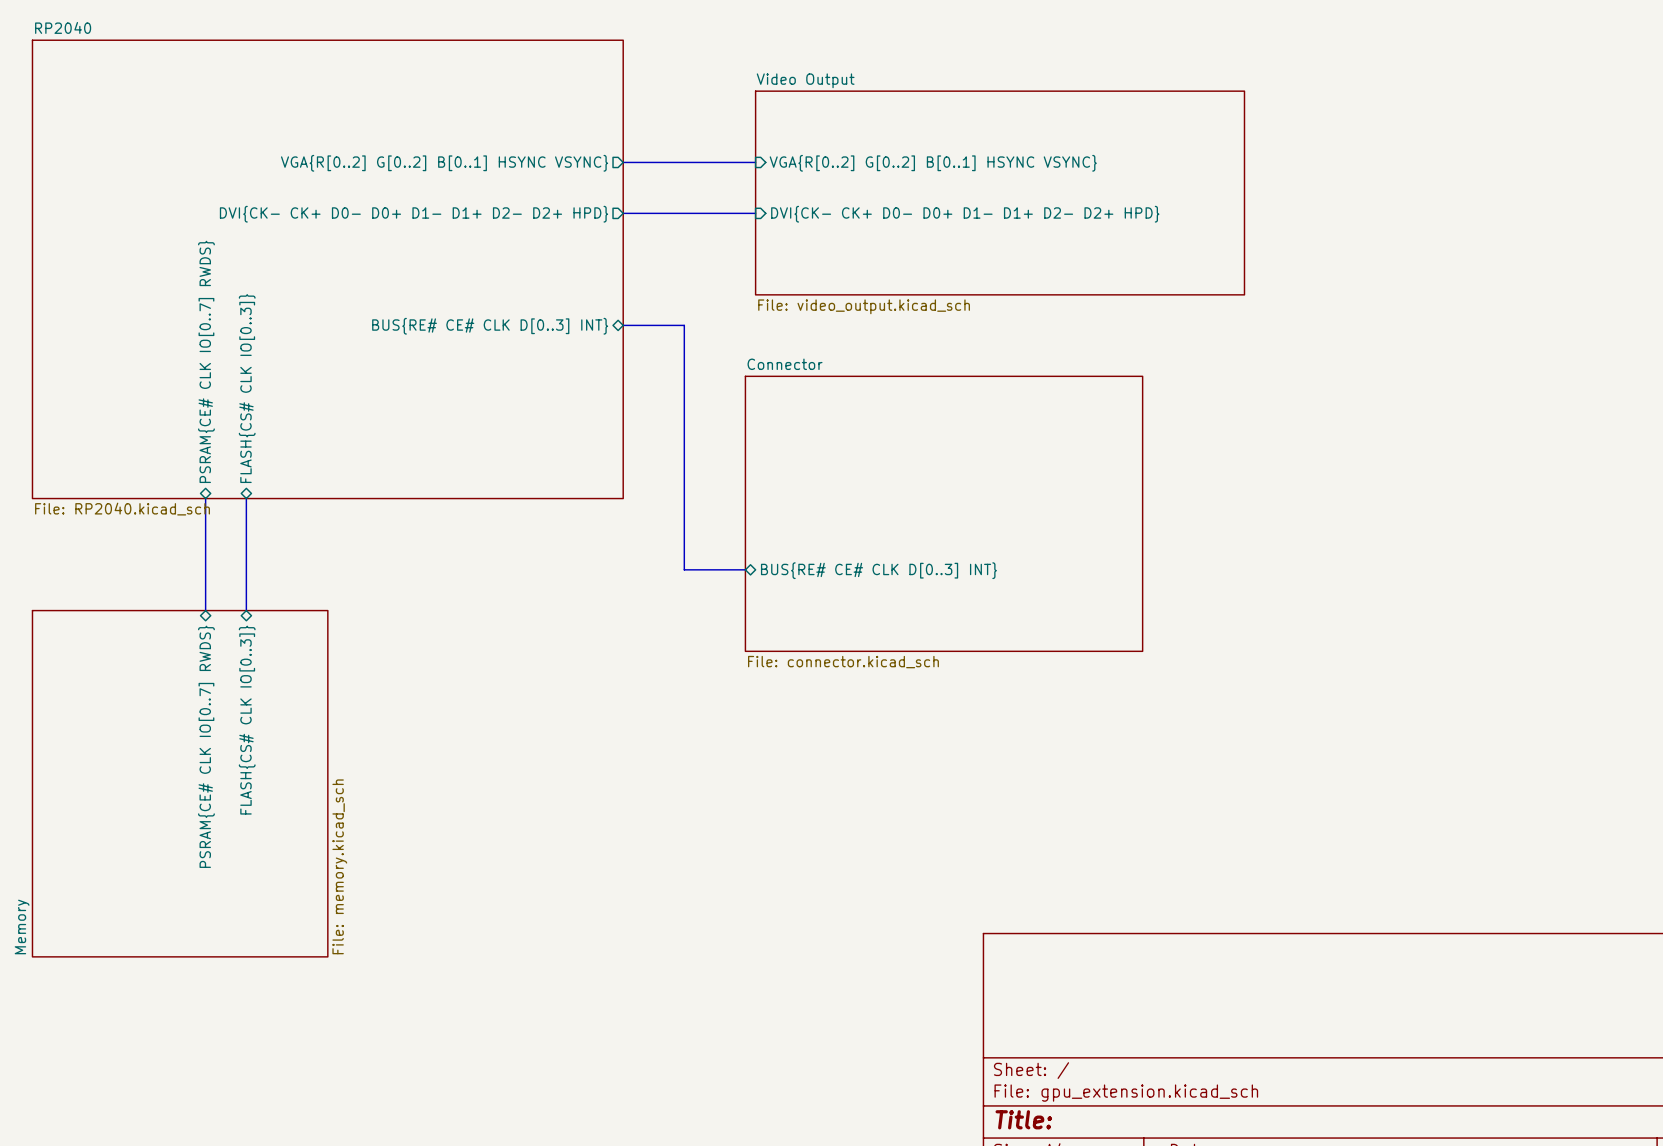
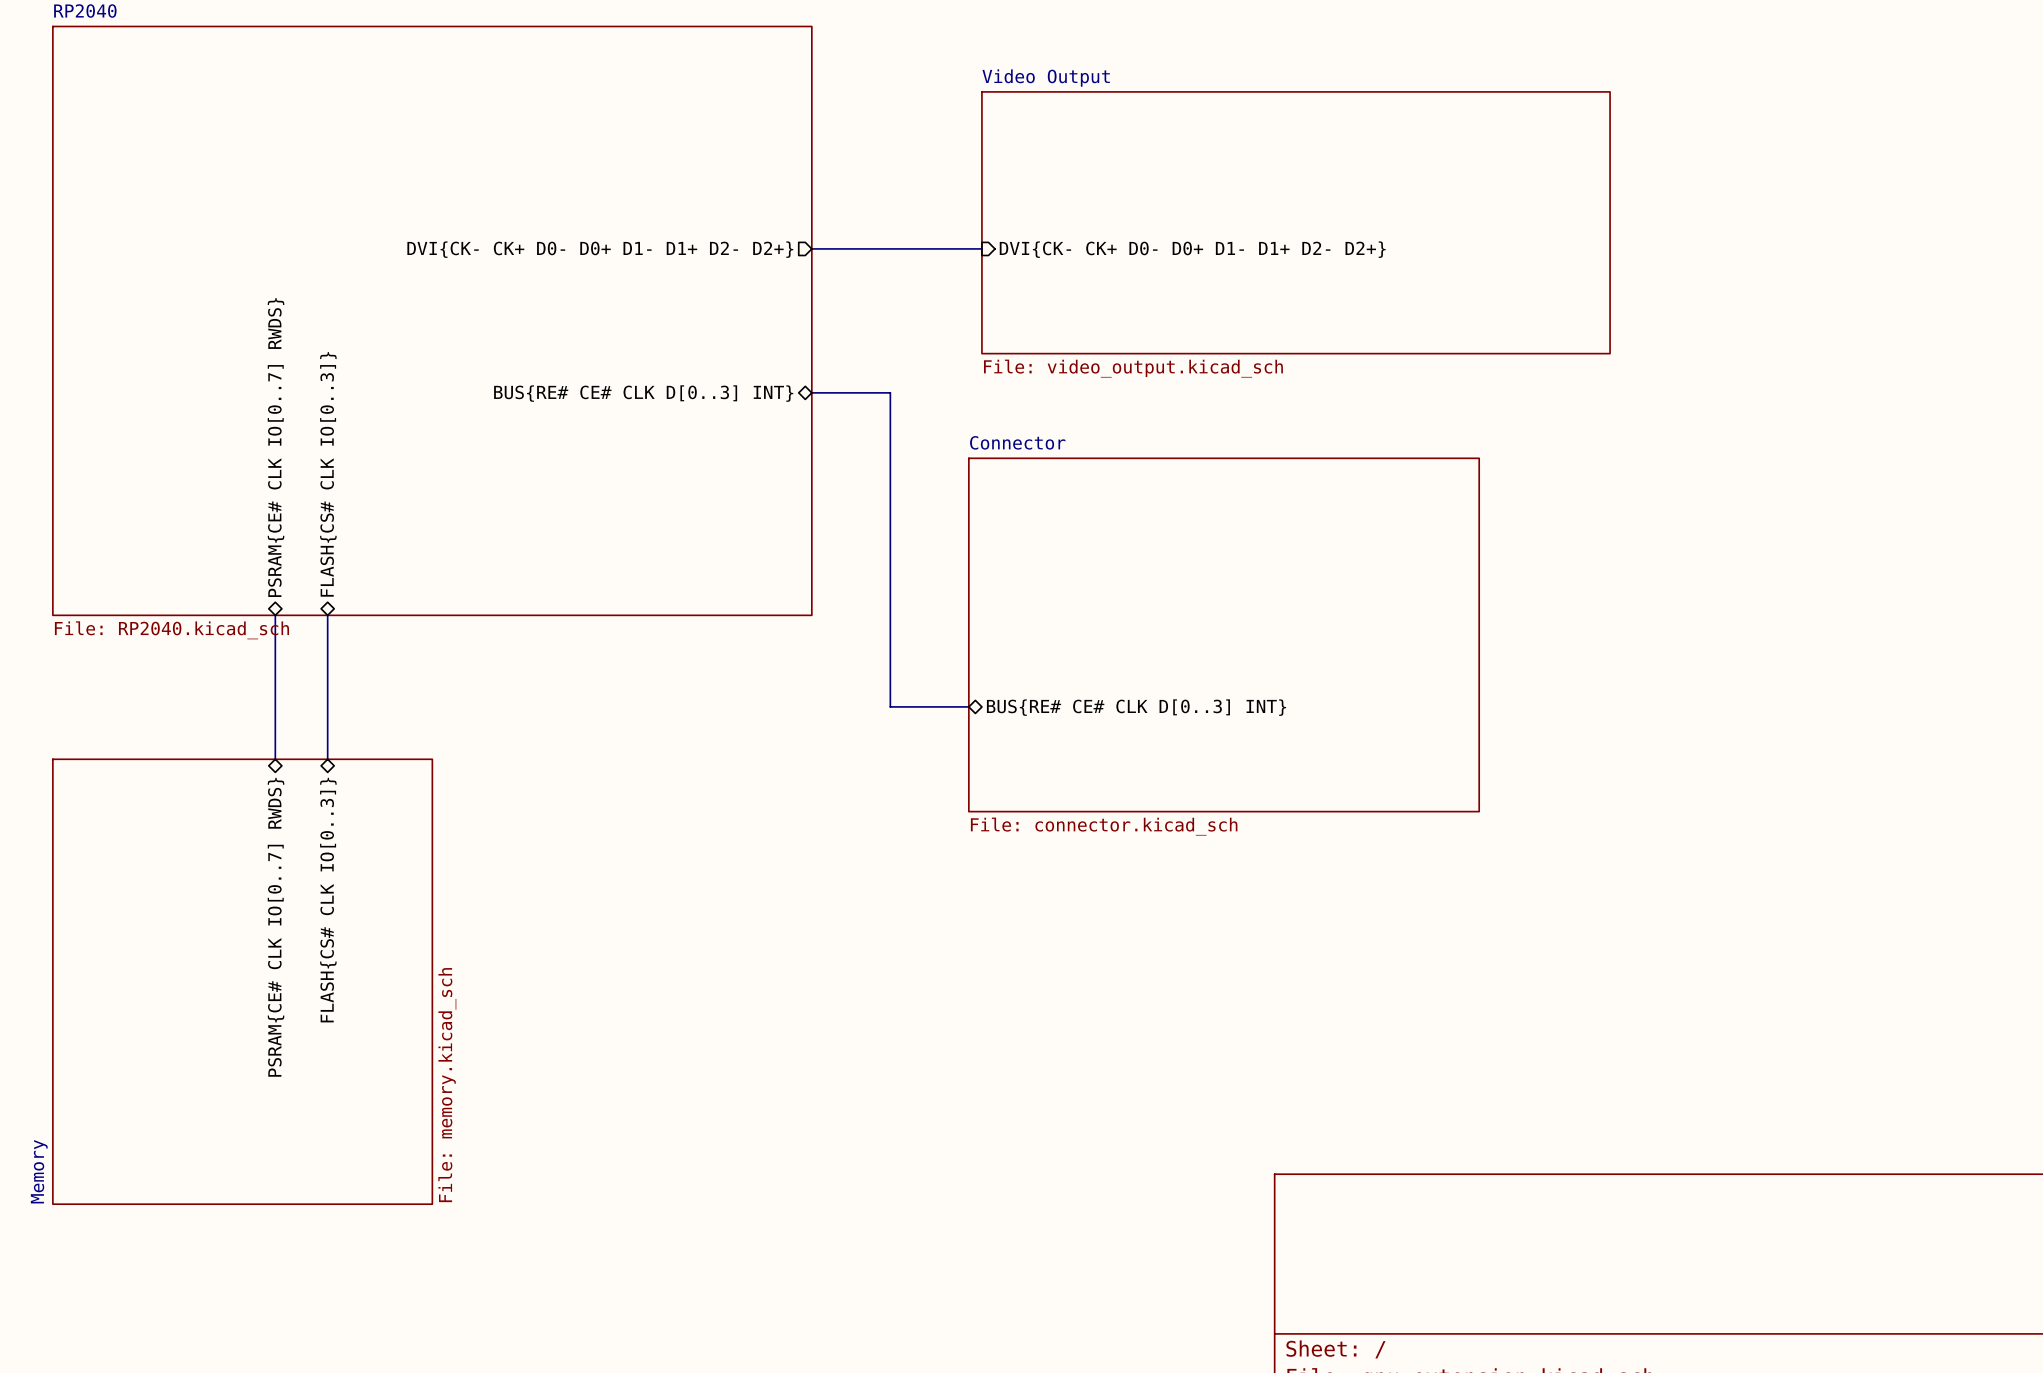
bus: (623, 162) (755, 162) -> none
sheet pin: VGA{R[0..2] G[0..2] B[0..1] HSYNC VSYNC} (444, 163) -> none
sheet pin: VGA{R[0..2] G[0..2] B[0..1] HSYNC VSYNC} (933, 163) -> none
sheet pin: DVI{CK- CK+ D0- D0+ D1- D1+ D2- D2+ HPD} (414, 214) -> DVI{CK- CK+ D0- D0+ D1- D1+ D2- D2+} (600, 249)
sheet pin: DVI{CK- CK+ D0- D0+ D1- D1+ D2- D2+ HPD} (965, 214) -> DVI{CK- CK+ D0- D0+ D1- D1+ D2- D2+} (1192, 249)

